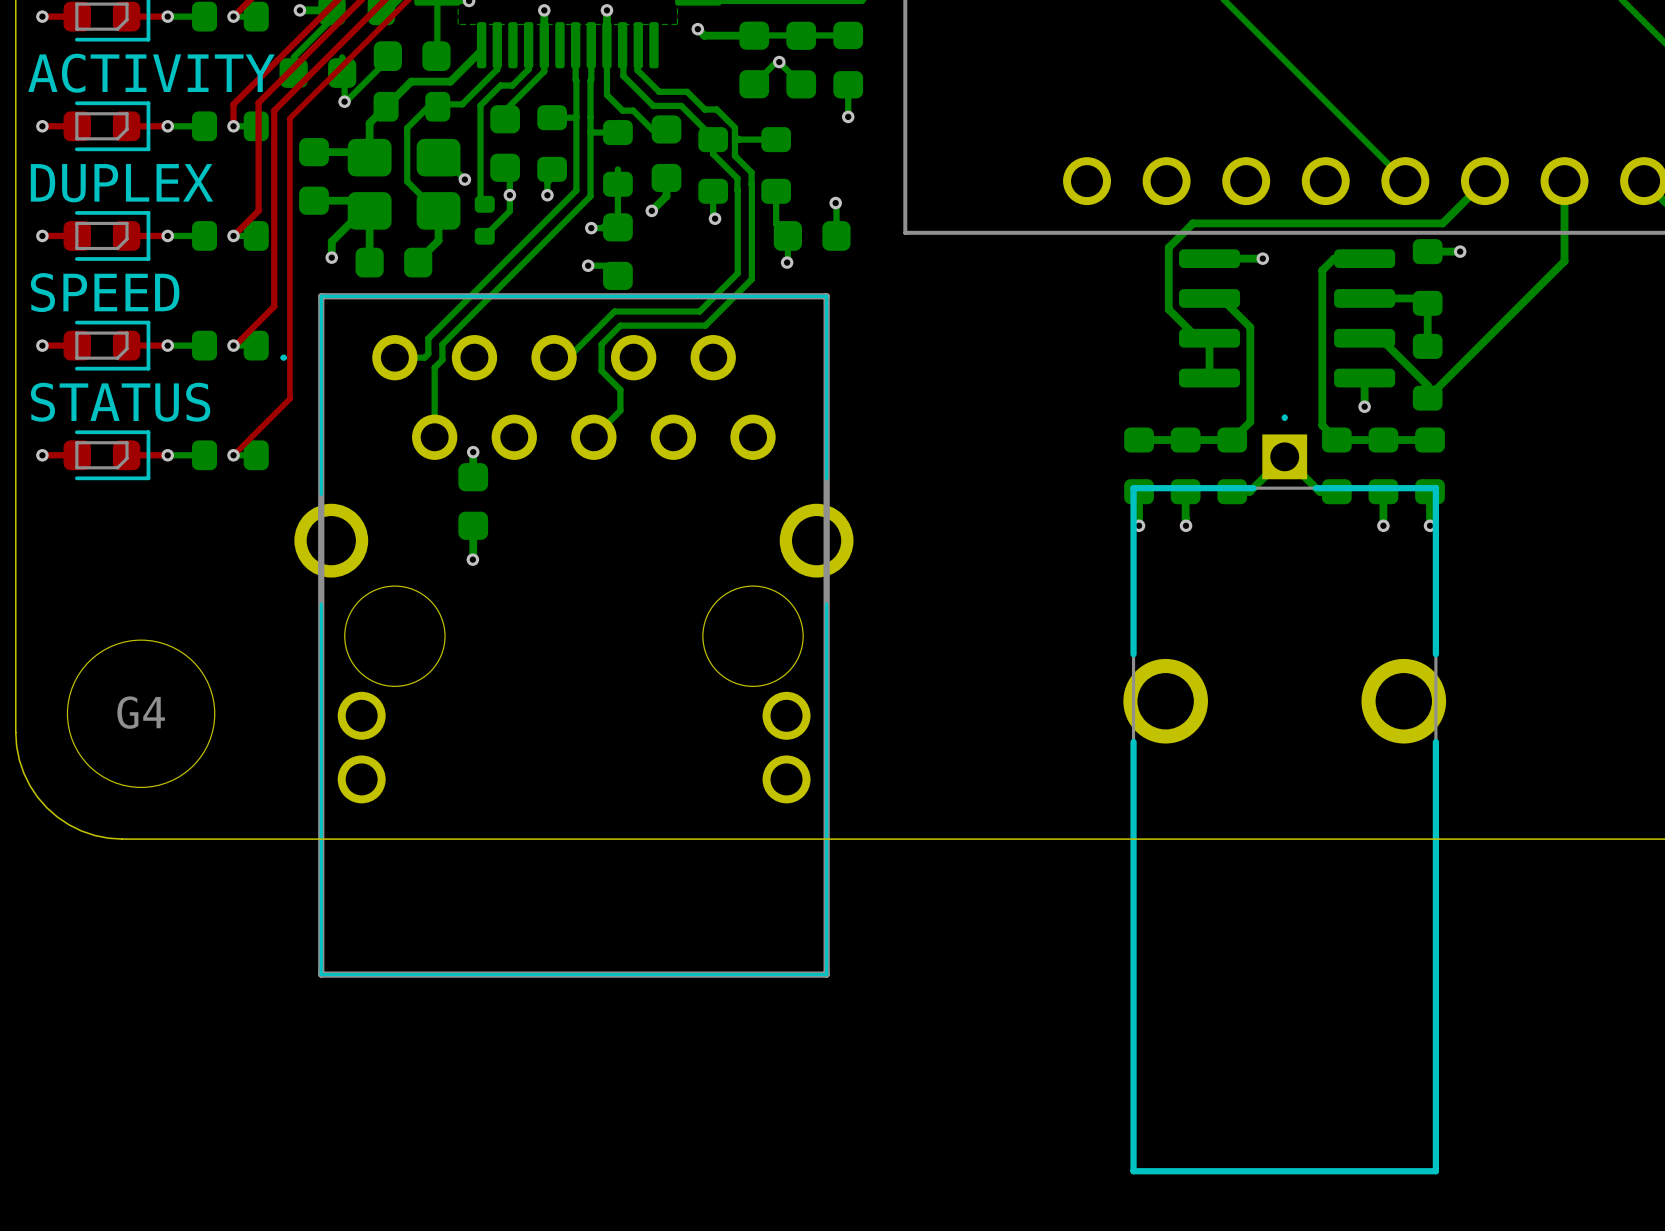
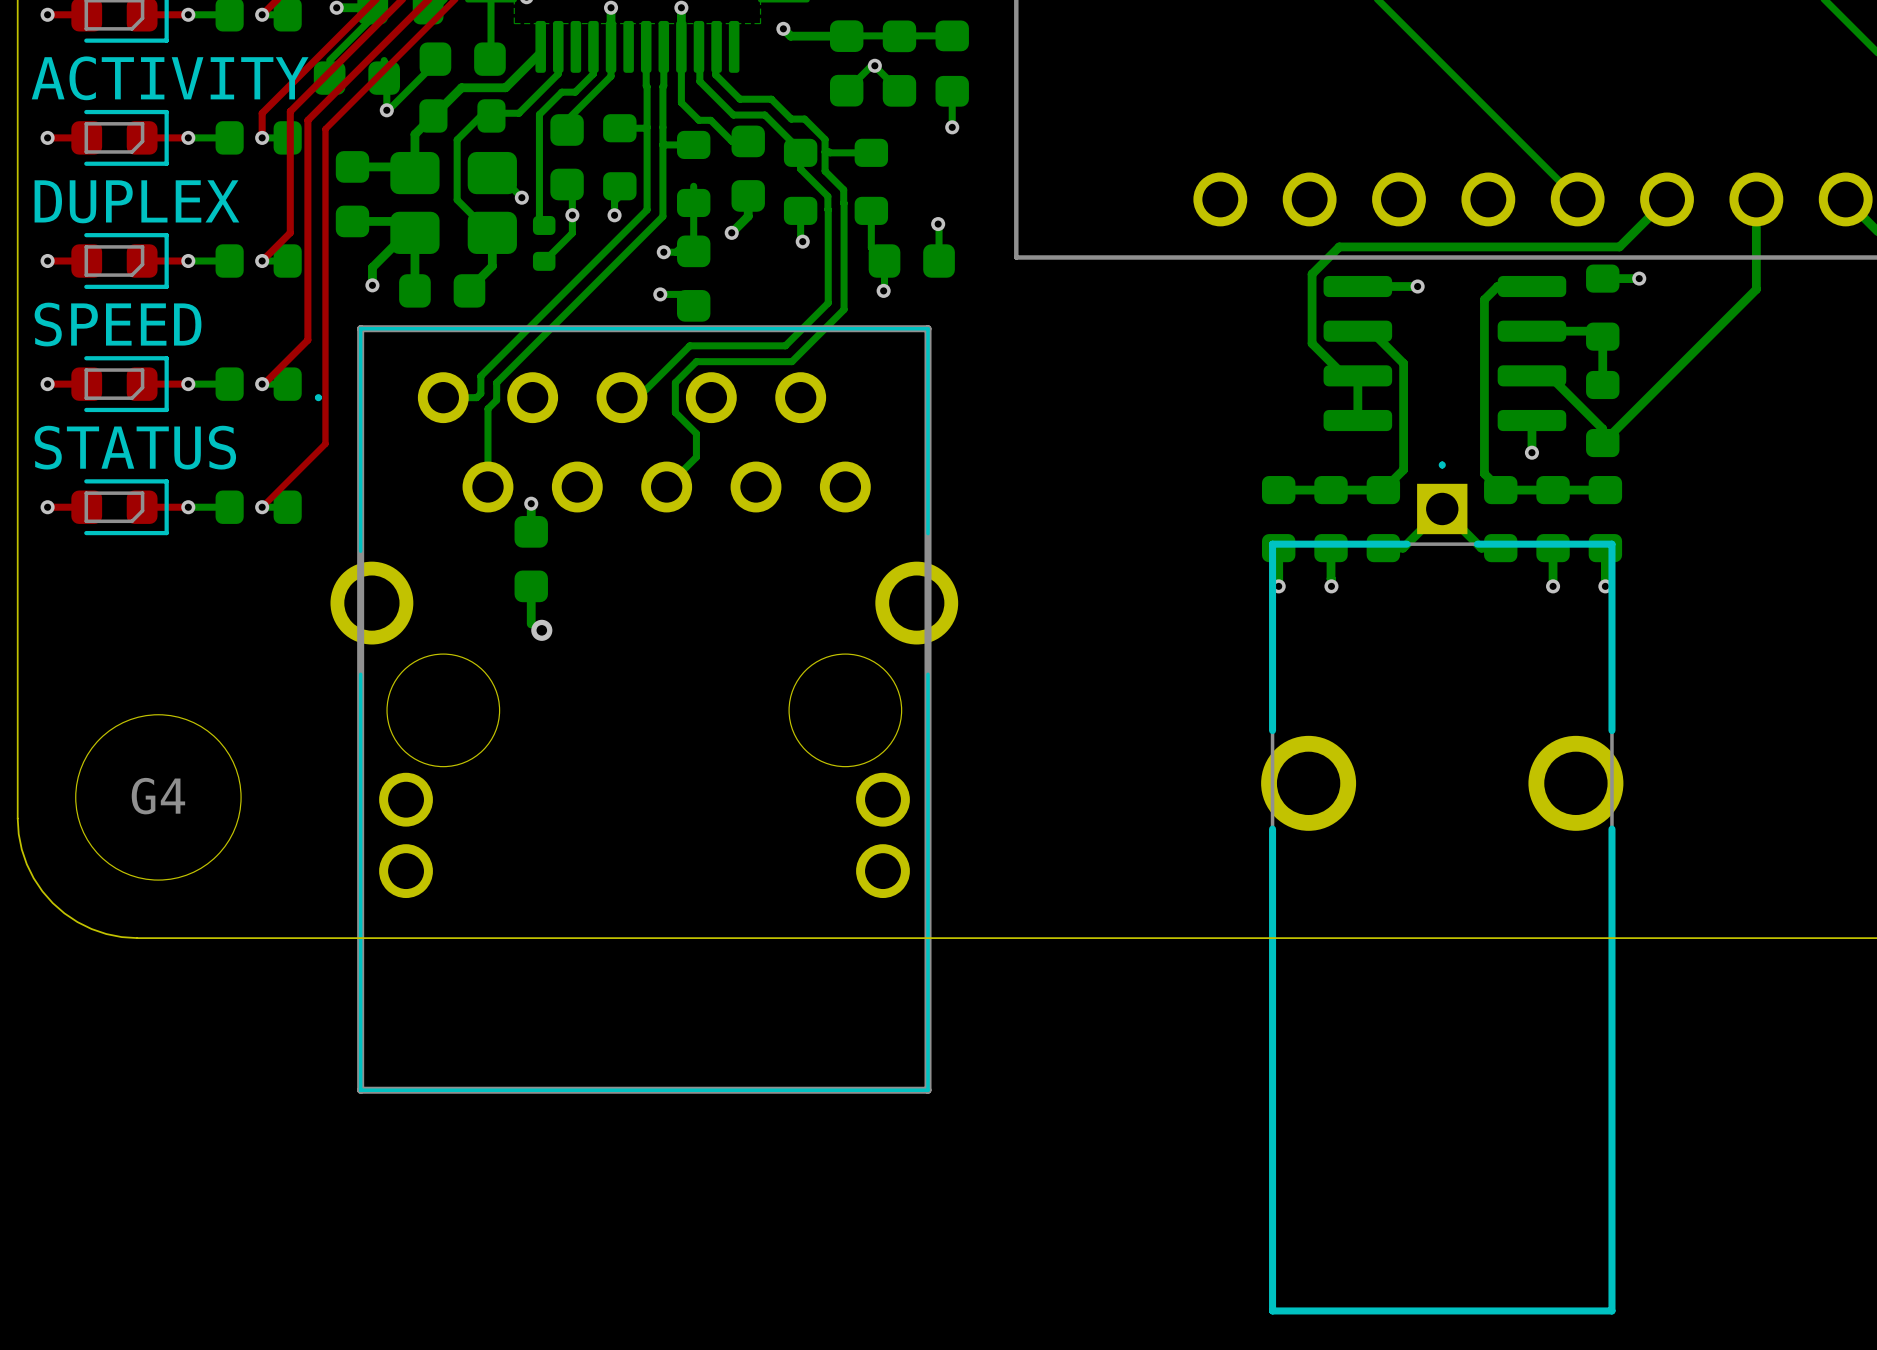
via size: [466, 553, 480, 566] -> [531, 619, 553, 641]

